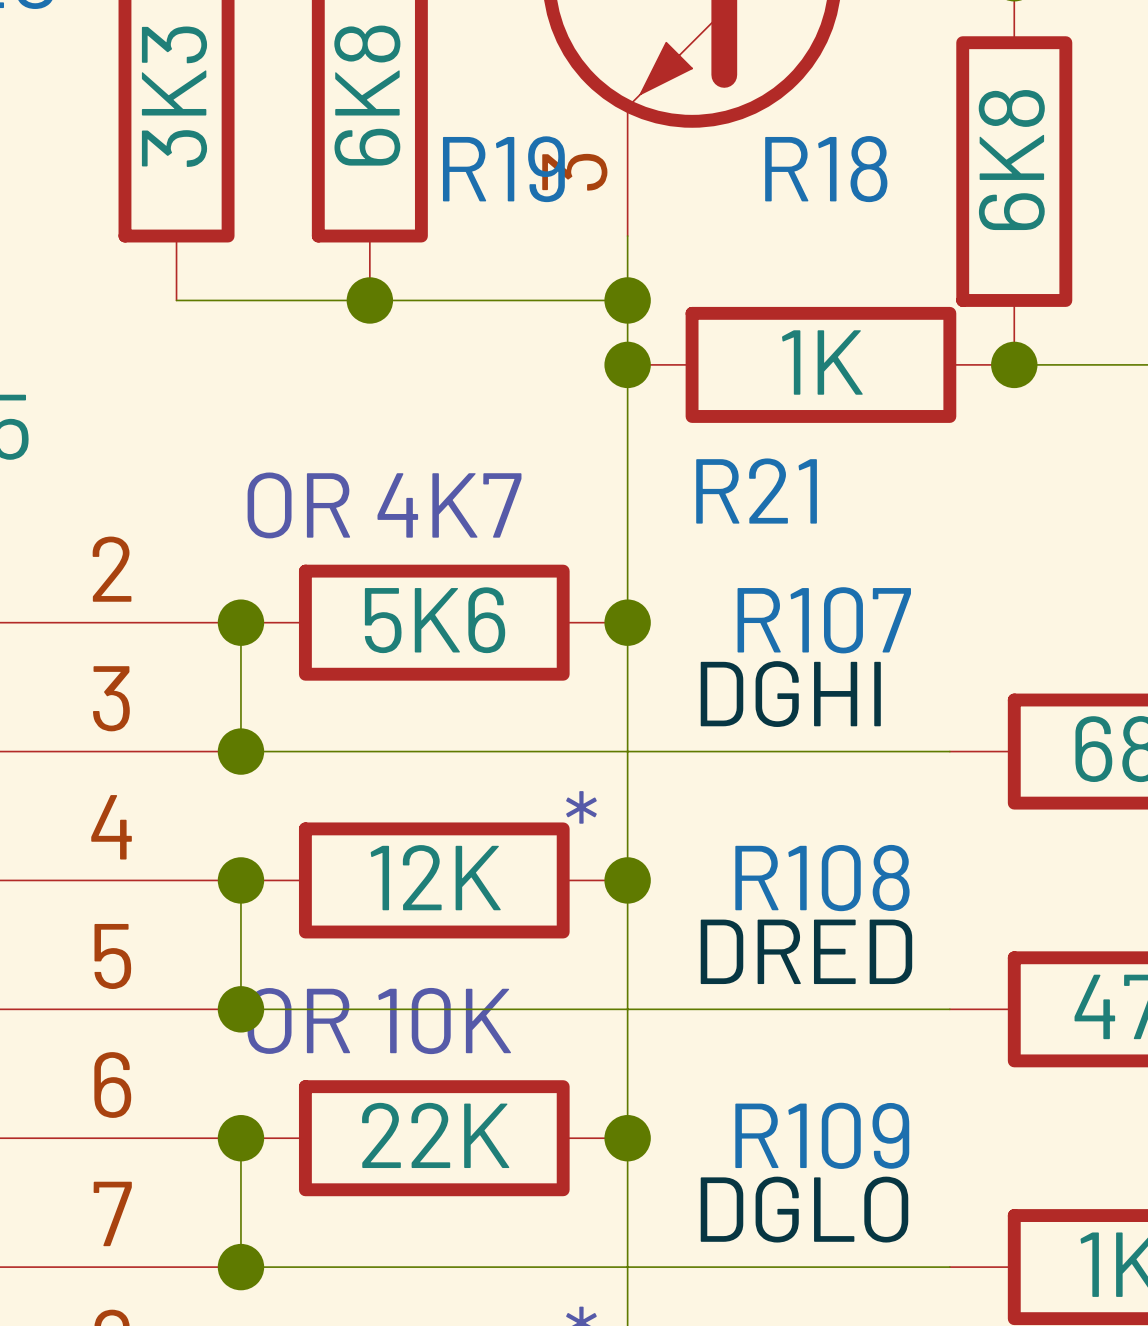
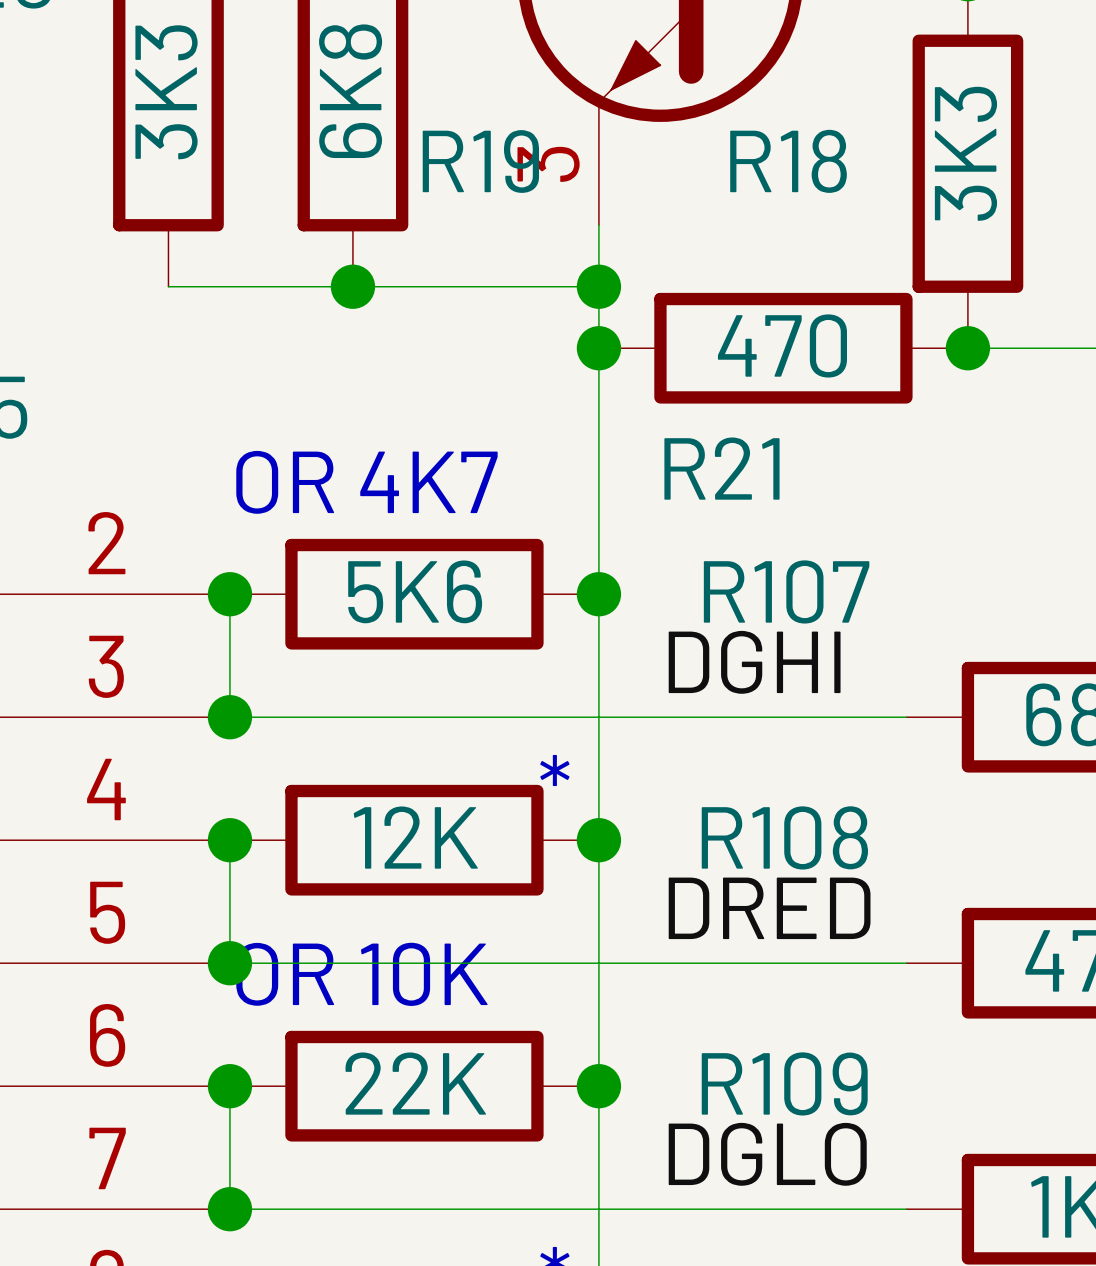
R18 value: 6K8 (1011, 160) -> 3K3 (965, 153)
R21 value: 1K (822, 362) -> 470 (782, 345)

